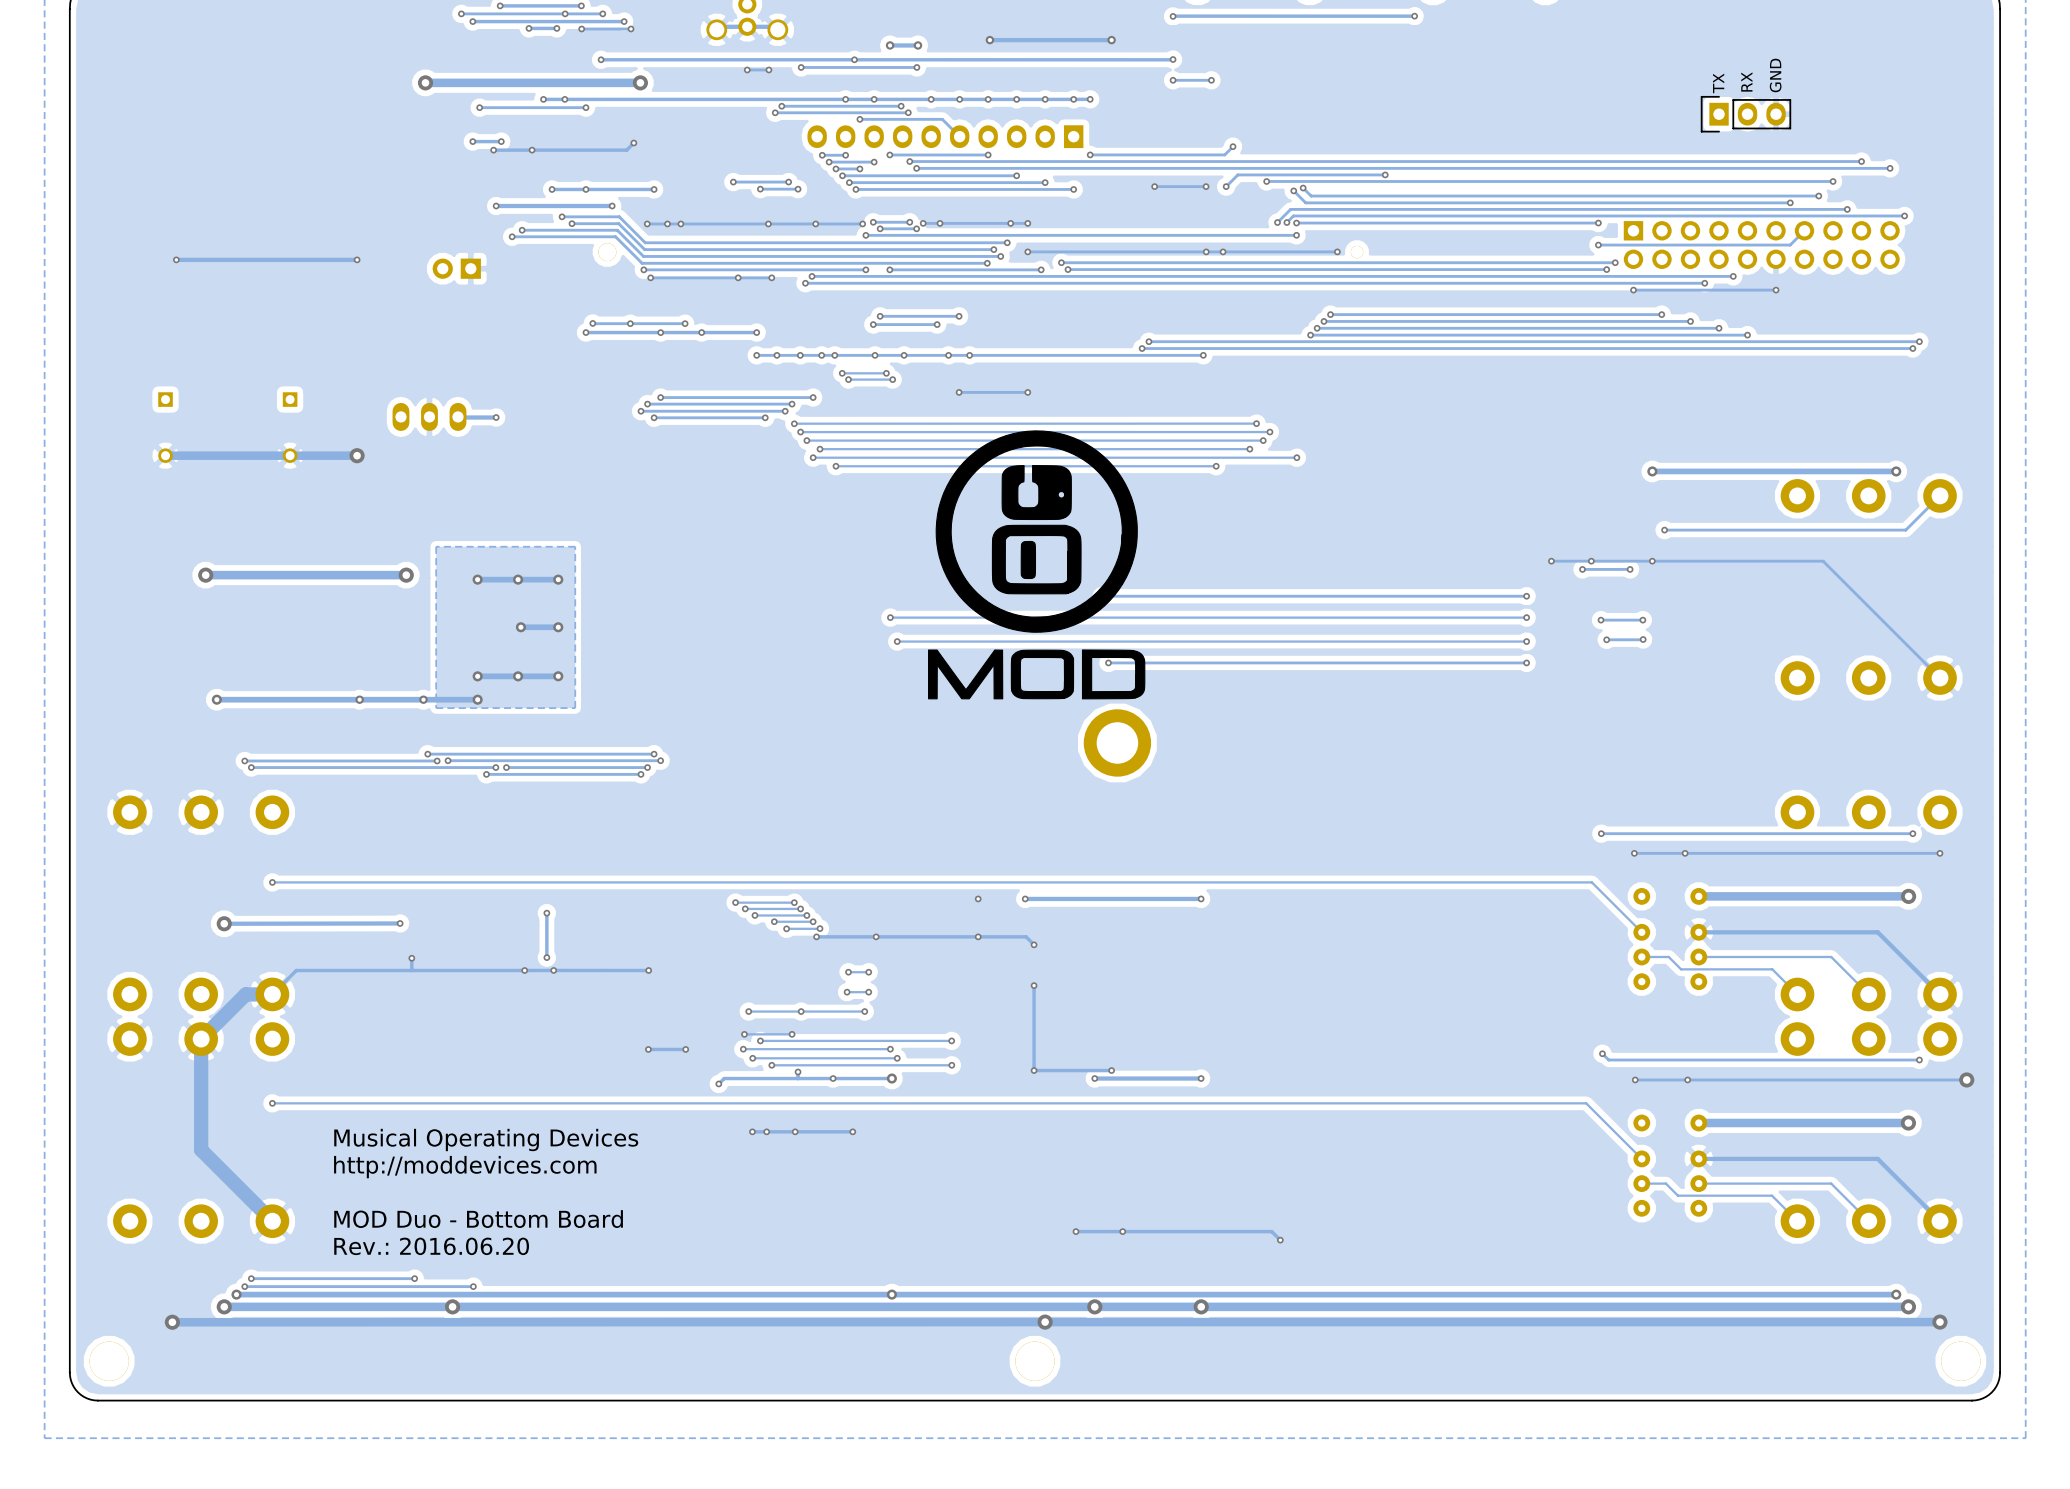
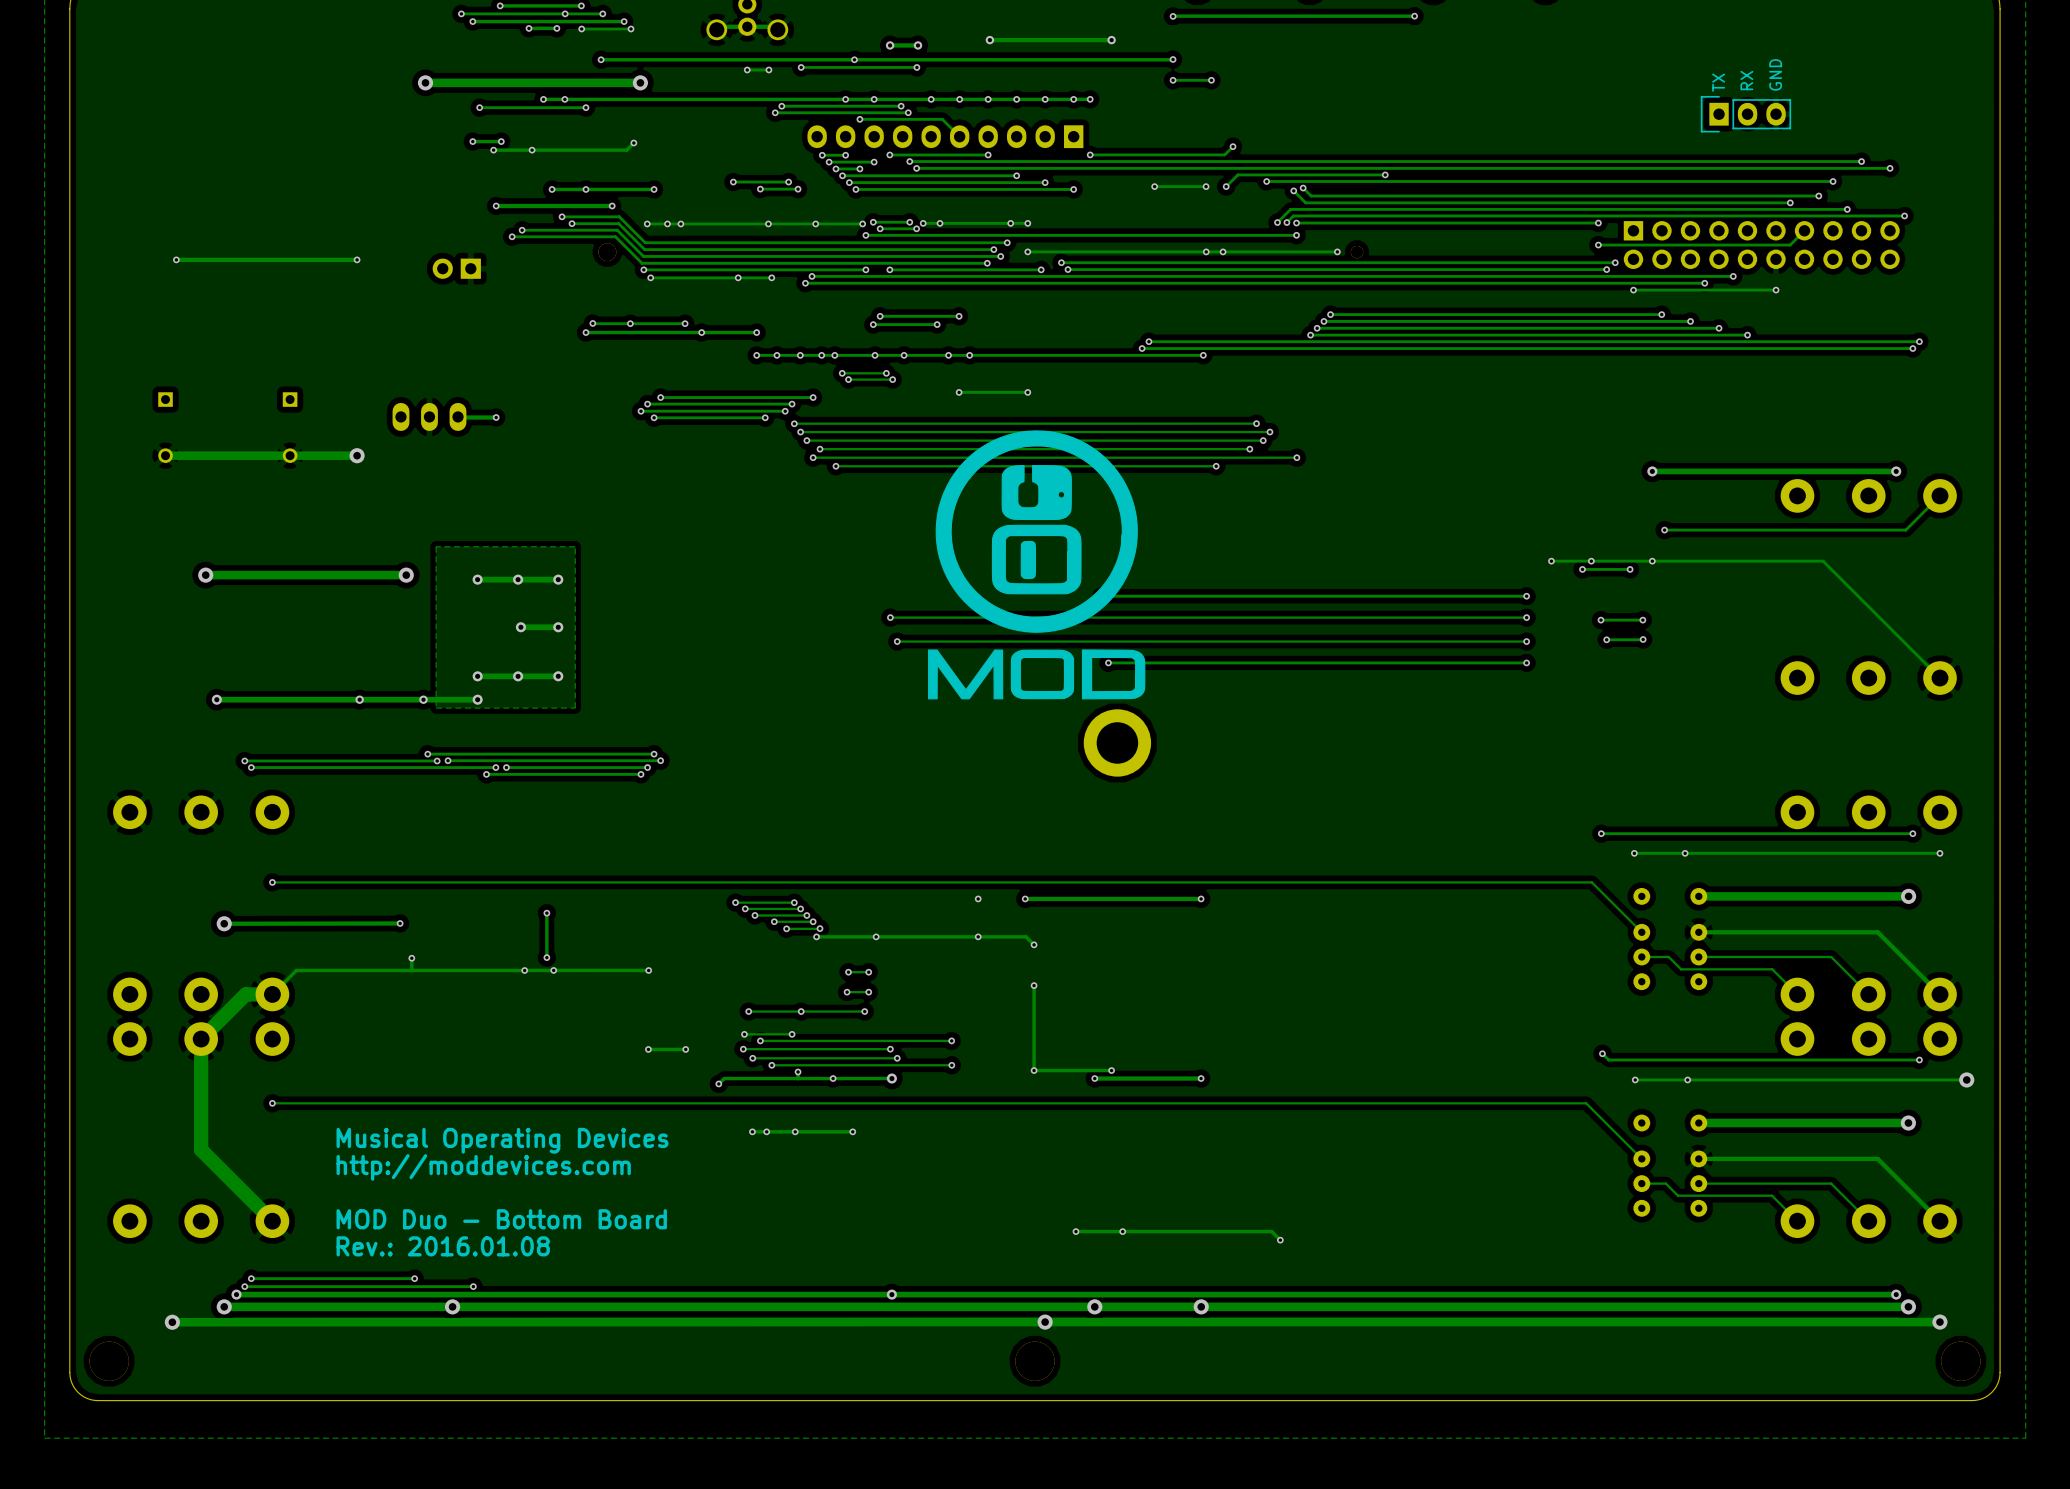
via: (660, 332) -> none
text: Rev.: 2016.06.20 (431, 1246) -> Rev.: 2016.01.08 (443, 1246)

